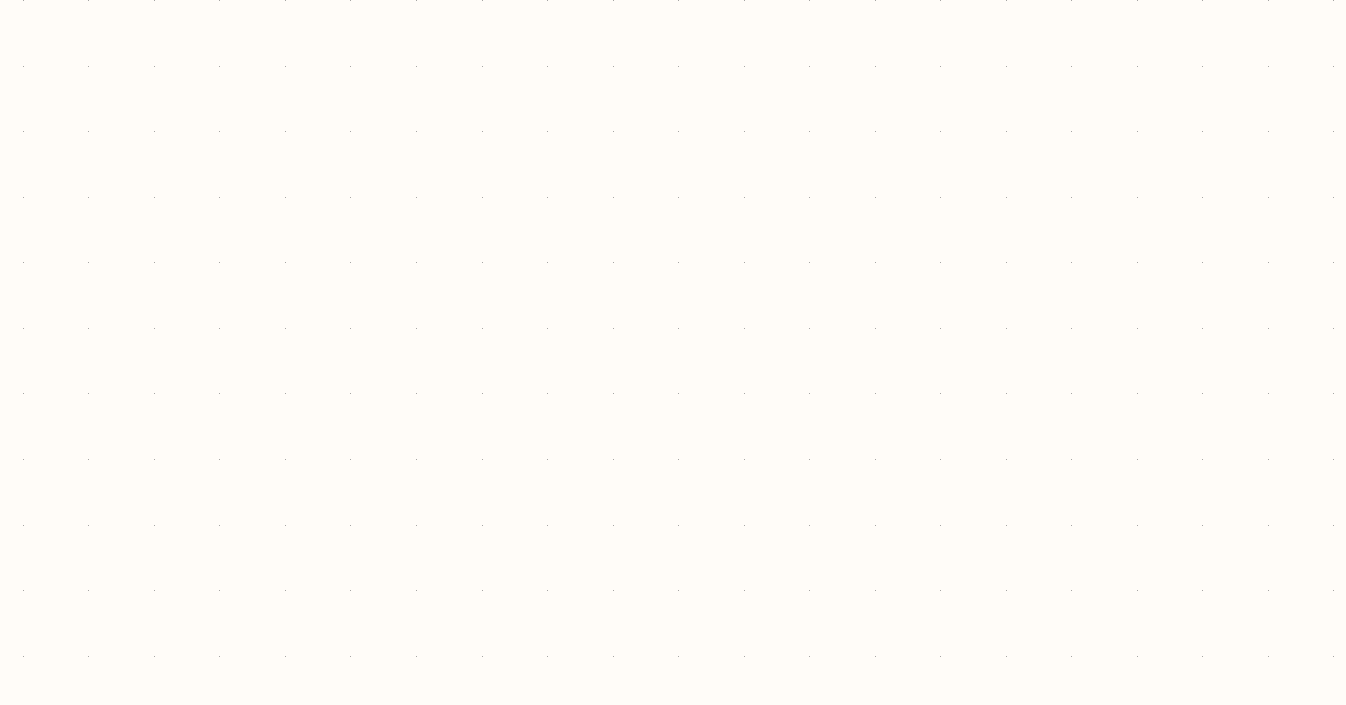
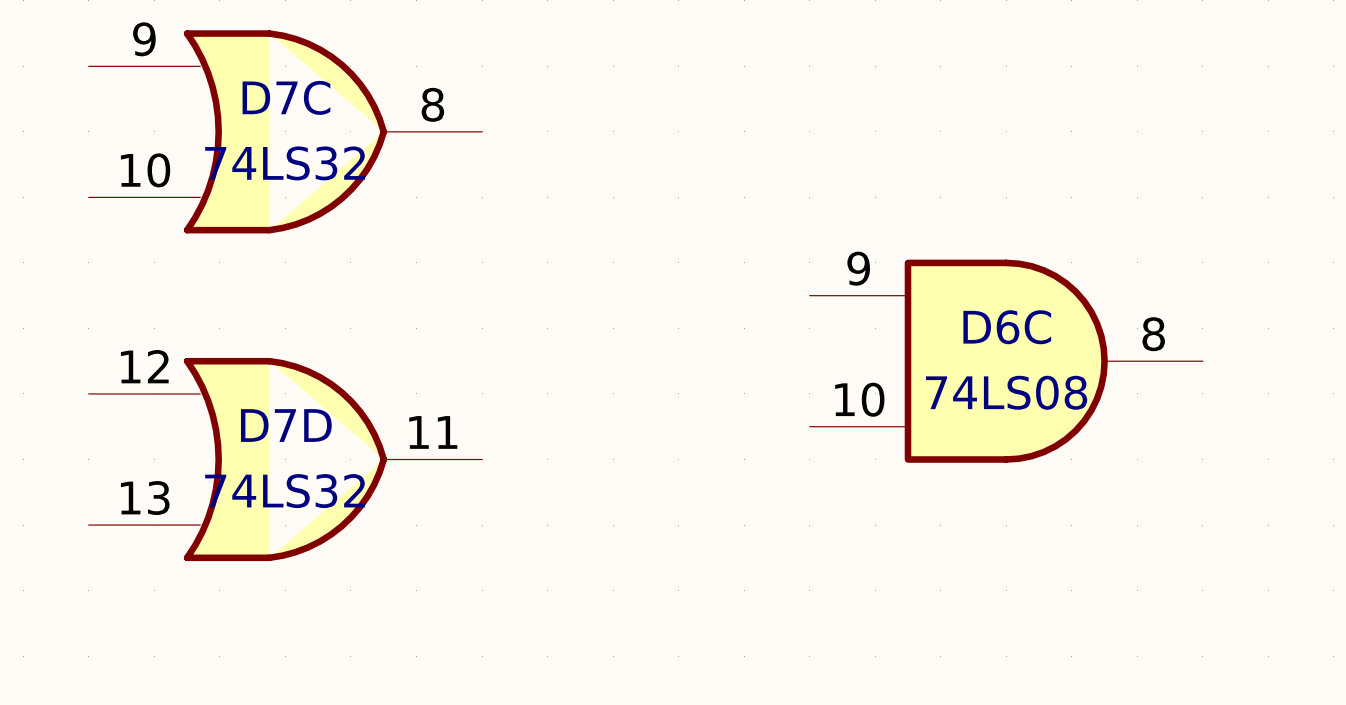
D7C: none -> 74LS32 (285, 131)
D6C: none -> 74LS08 (1006, 361)
D7D: none -> 74LS32 (285, 459)

